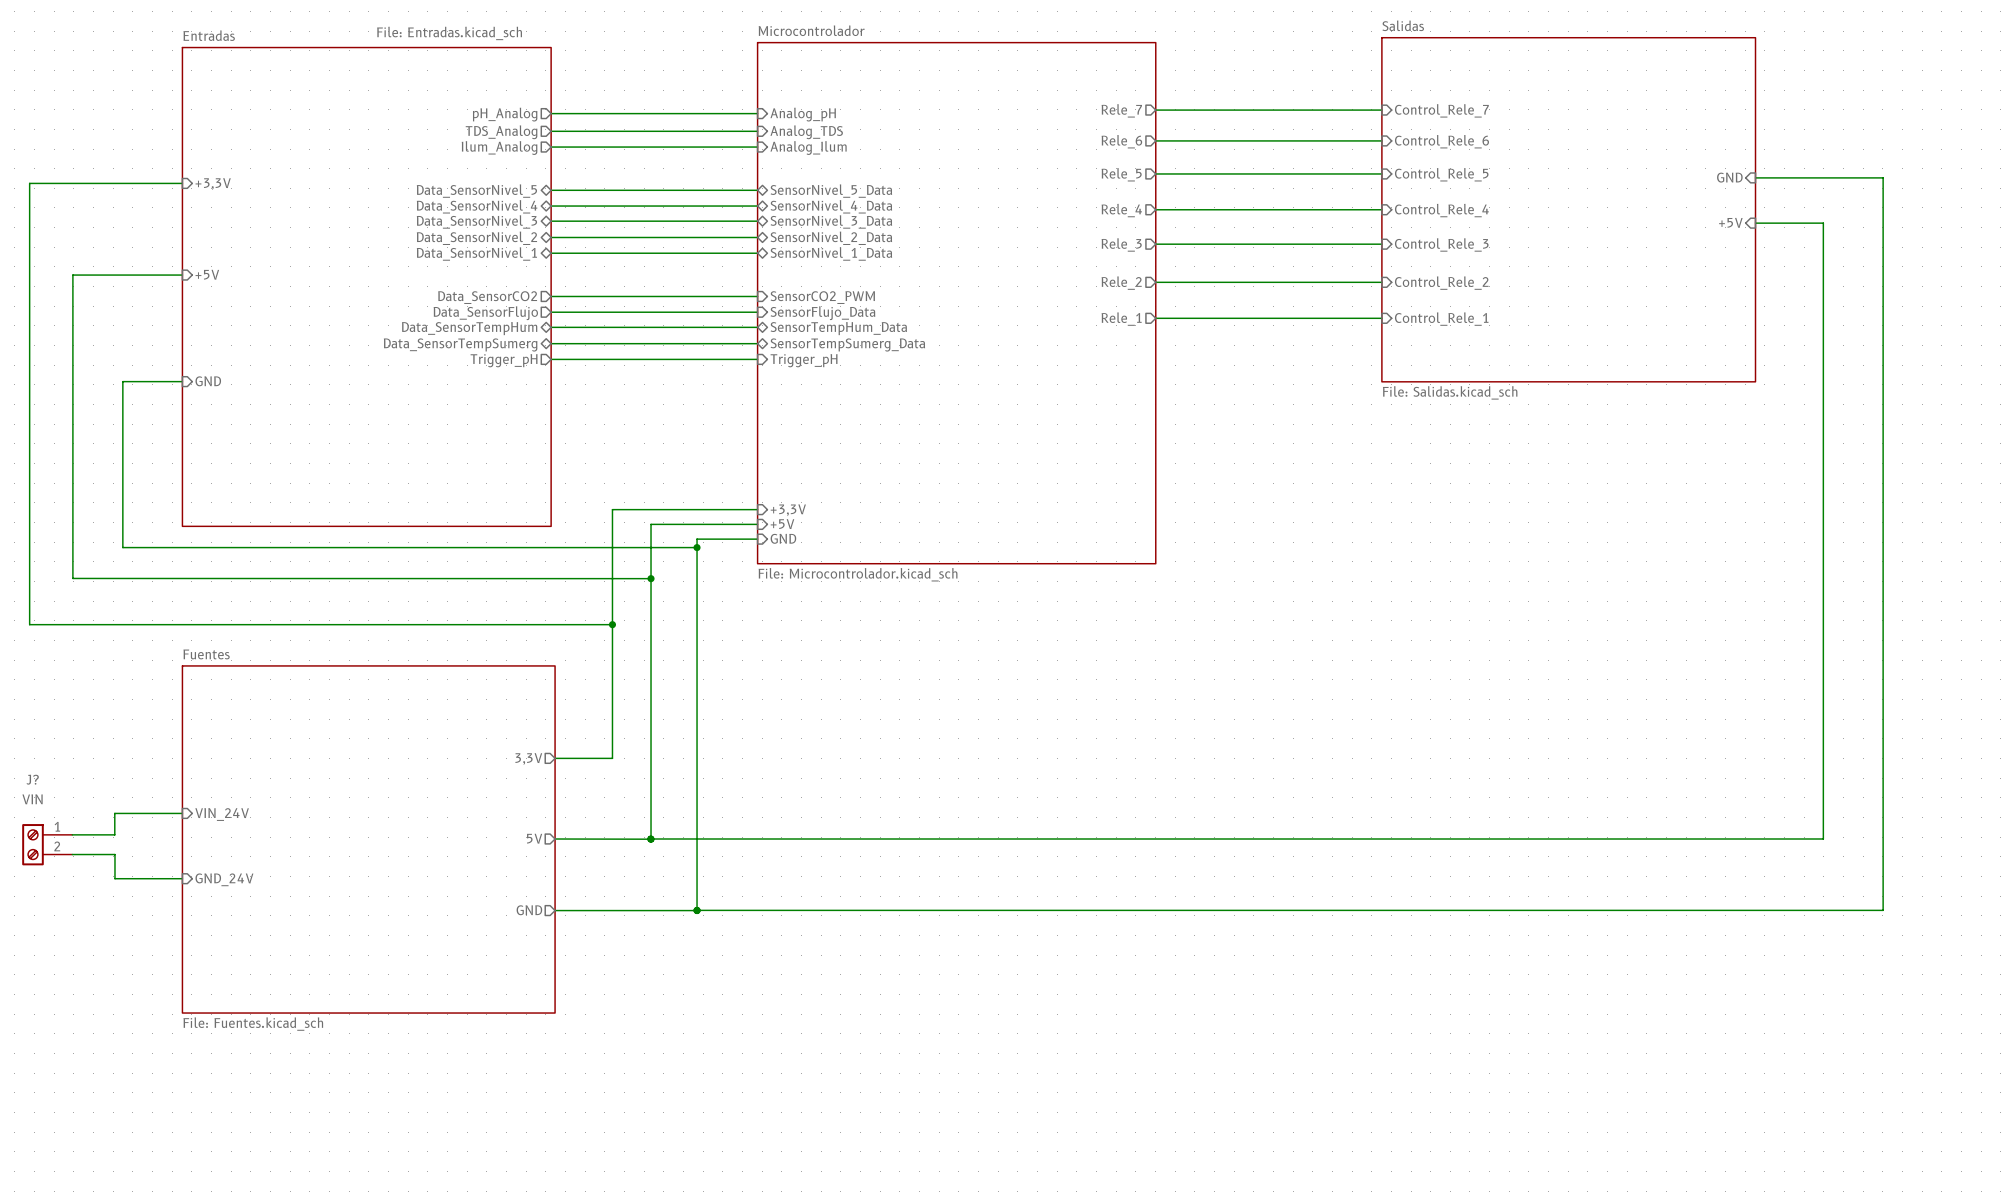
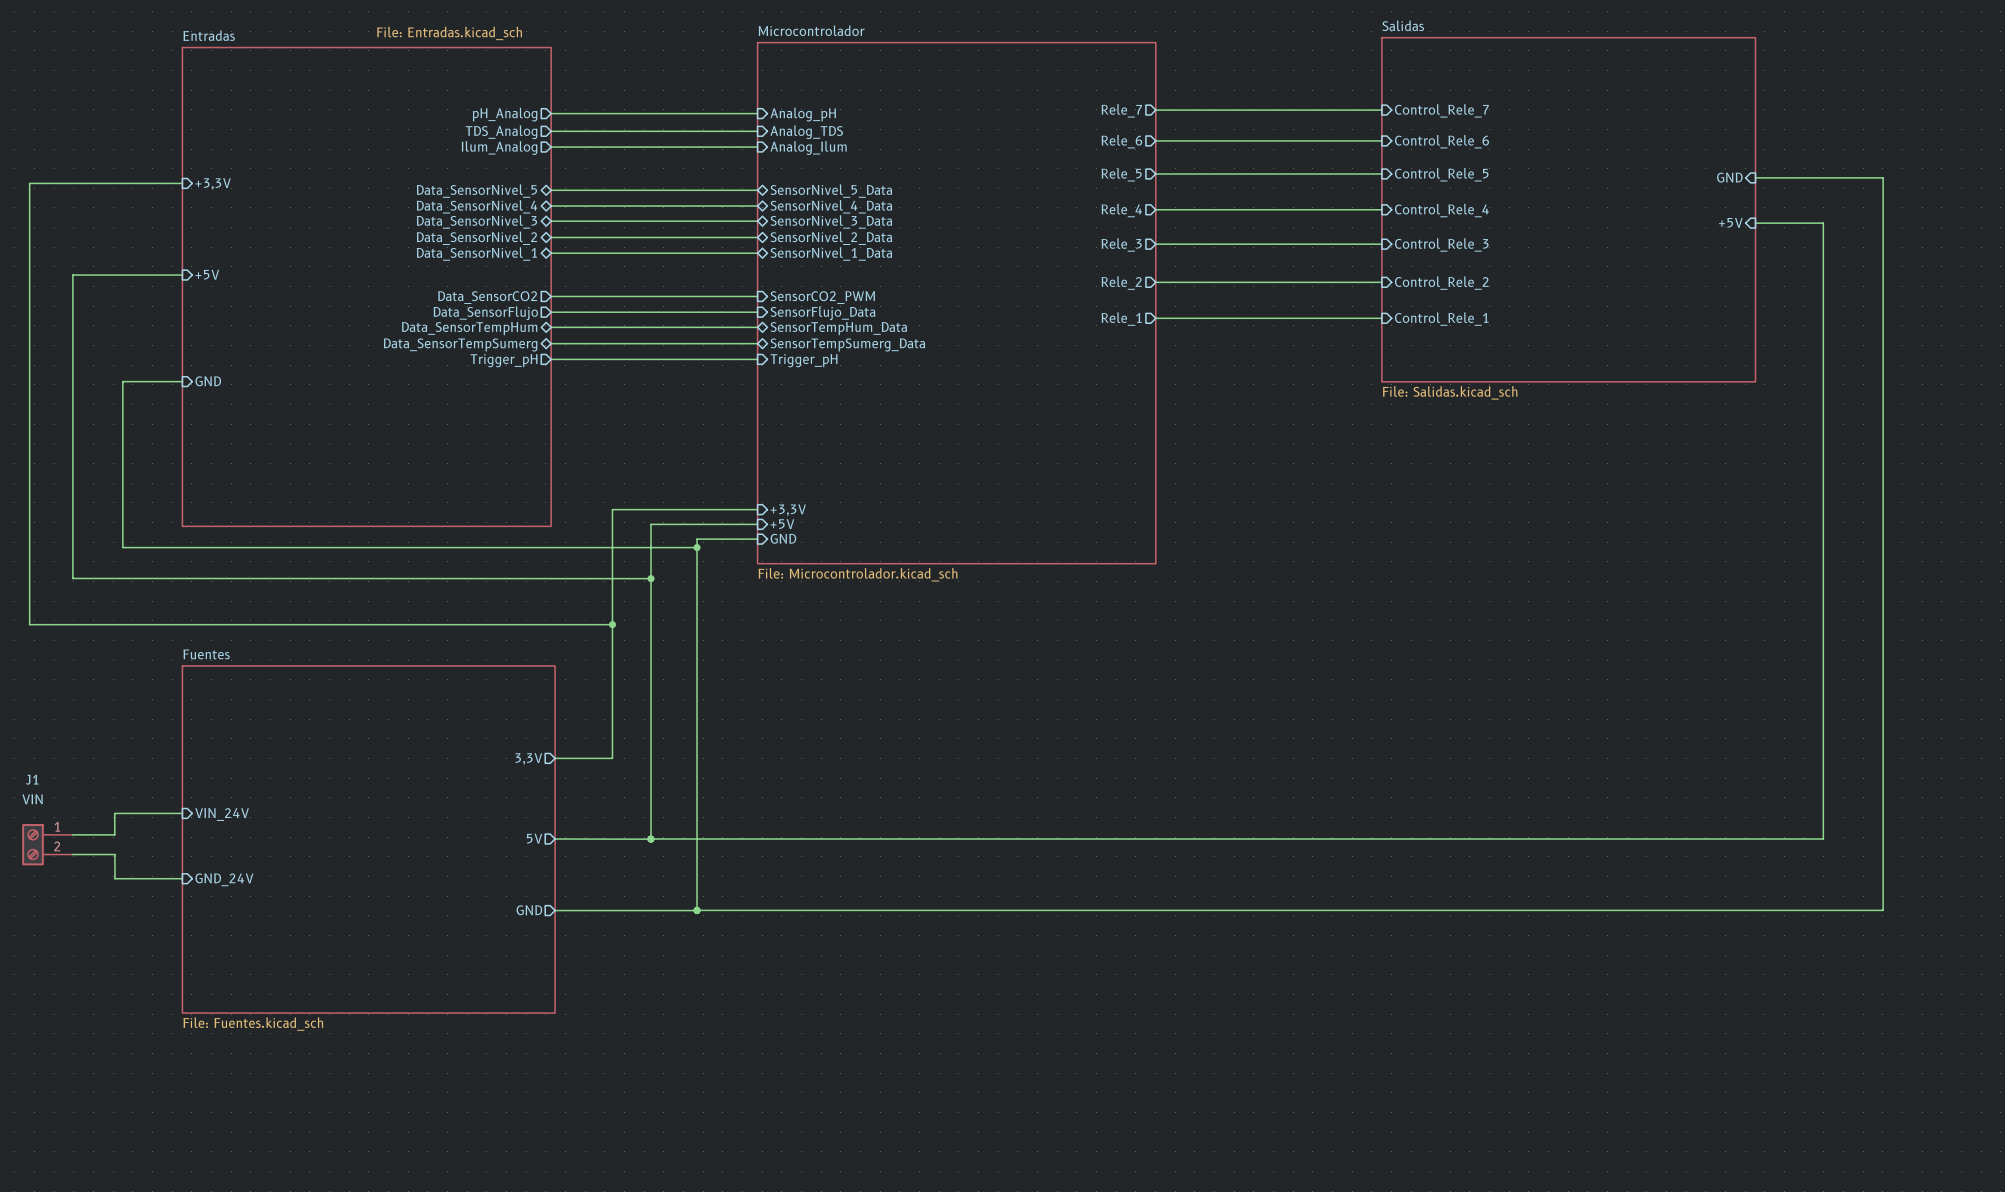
J? name: J? (32, 779) -> J1 (32, 779)

